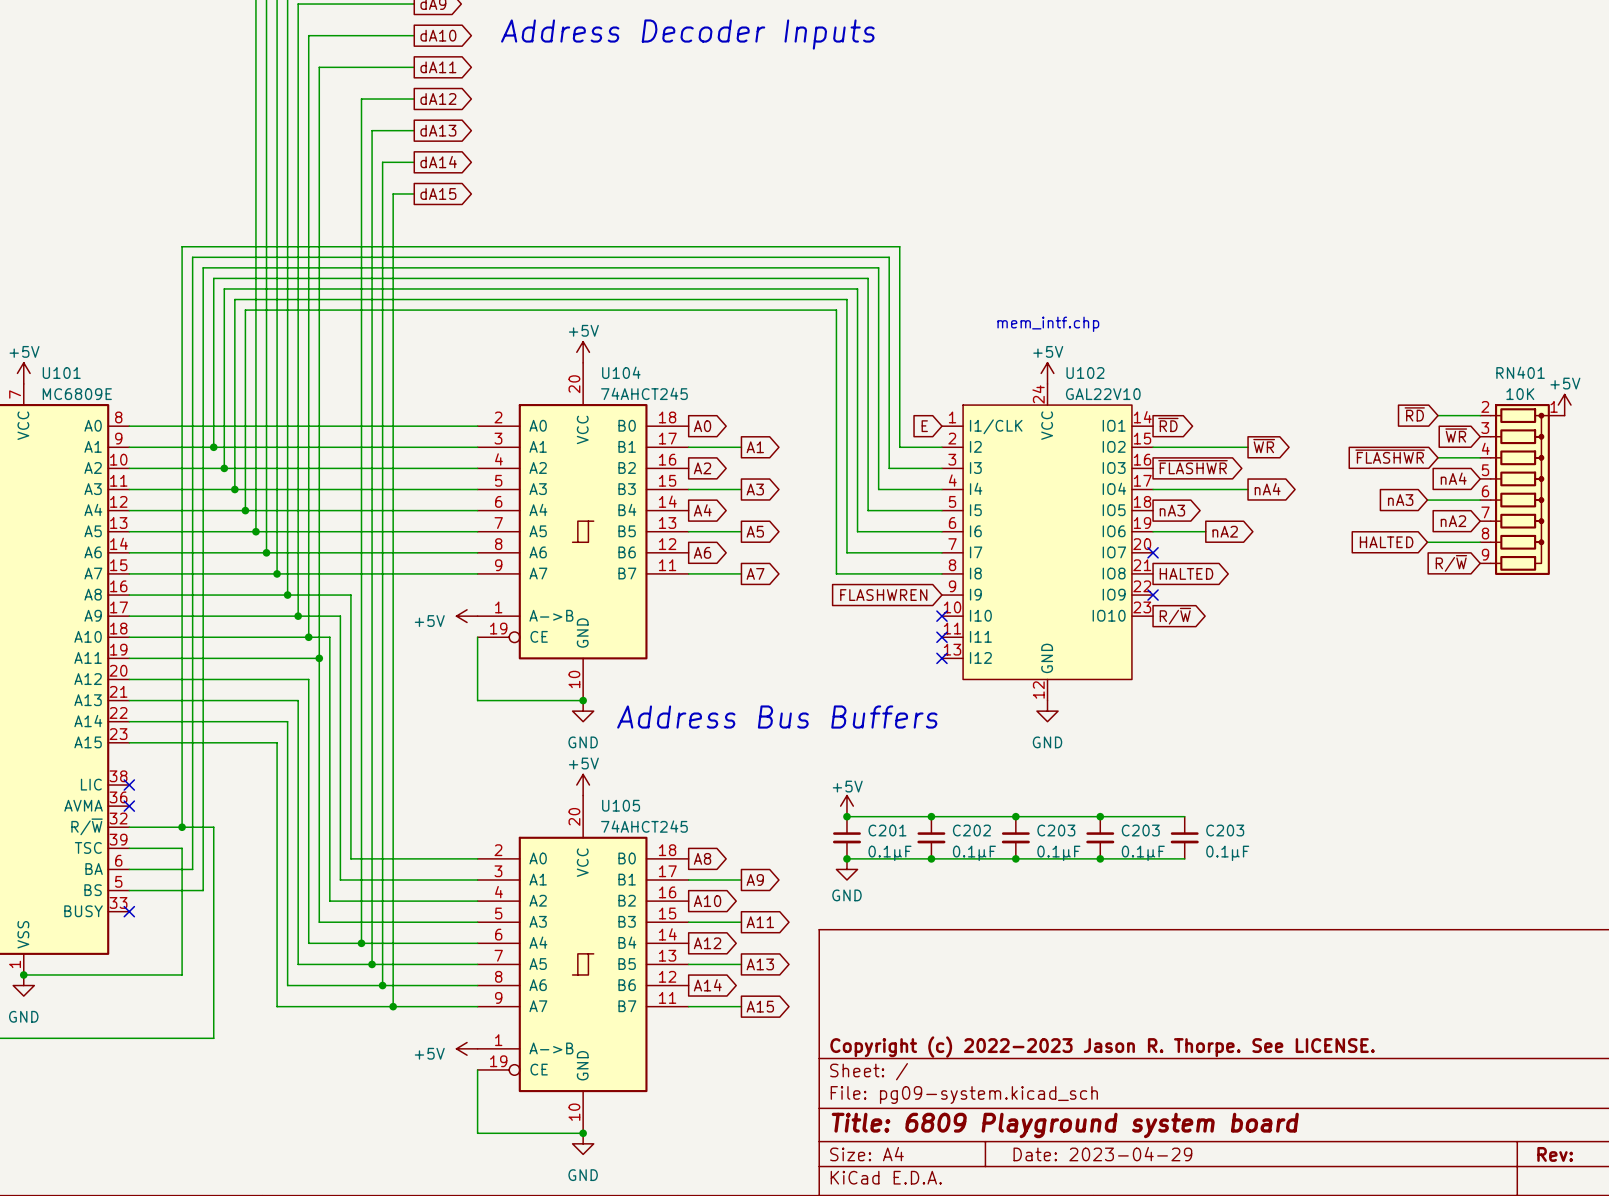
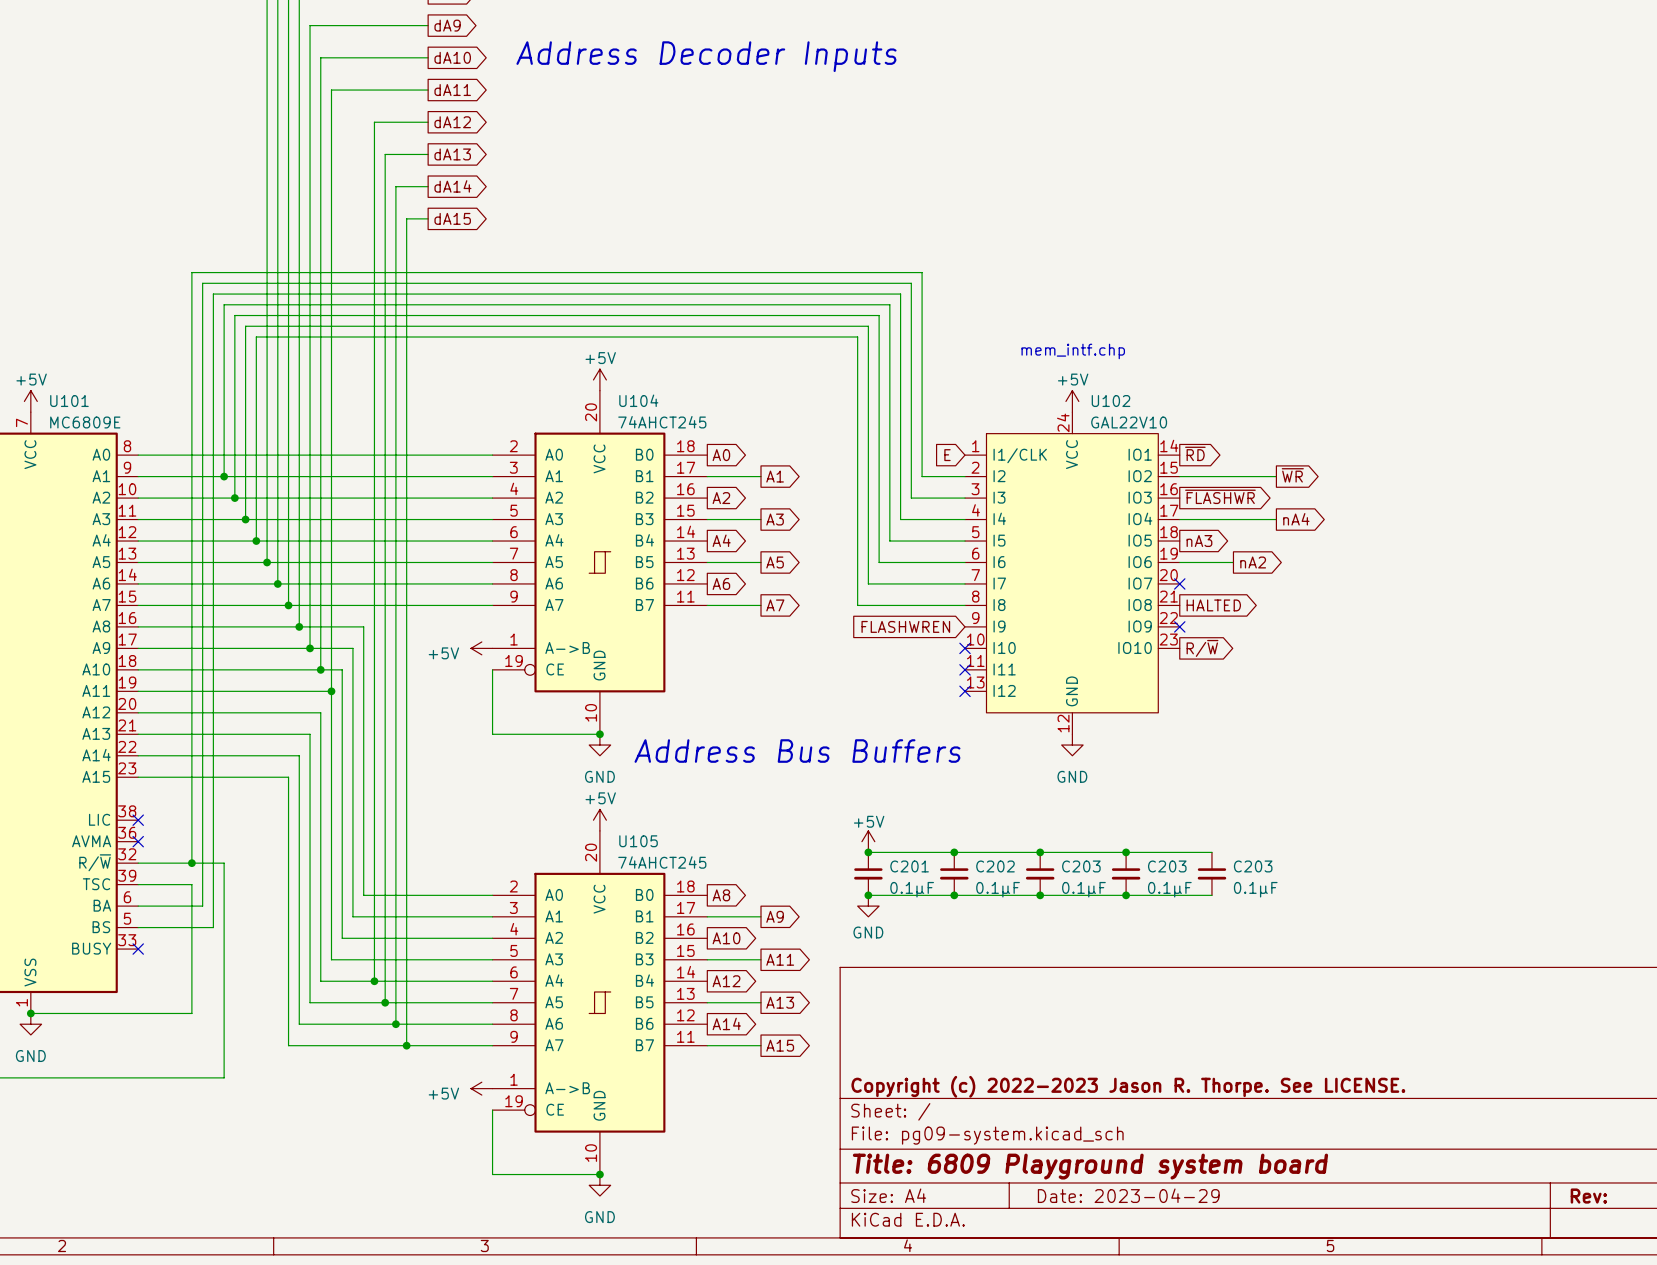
power symbol: +5V (1564, 405) -> none
global label: ~{RD} (1414, 414) -> none
wire: (1438, 415) (1480, 415) -> none
global label: ~{WR} (1456, 435) -> none
global label: ~{FLASHWR} (1390, 456) -> none
wire: (1438, 457) (1480, 457) -> none
global label: nA4 (1453, 478) -> none
RN401: 10K (1522, 489) -> none
global label: nA3 (1400, 500) -> none
wire: (1427, 500) (1480, 500) -> none
global label: nA2 (1453, 521) -> none
global label: HALTED (1386, 542) -> none
wire: (1427, 542) (1480, 542) -> none
global label: R/~{W} (1451, 563) -> none

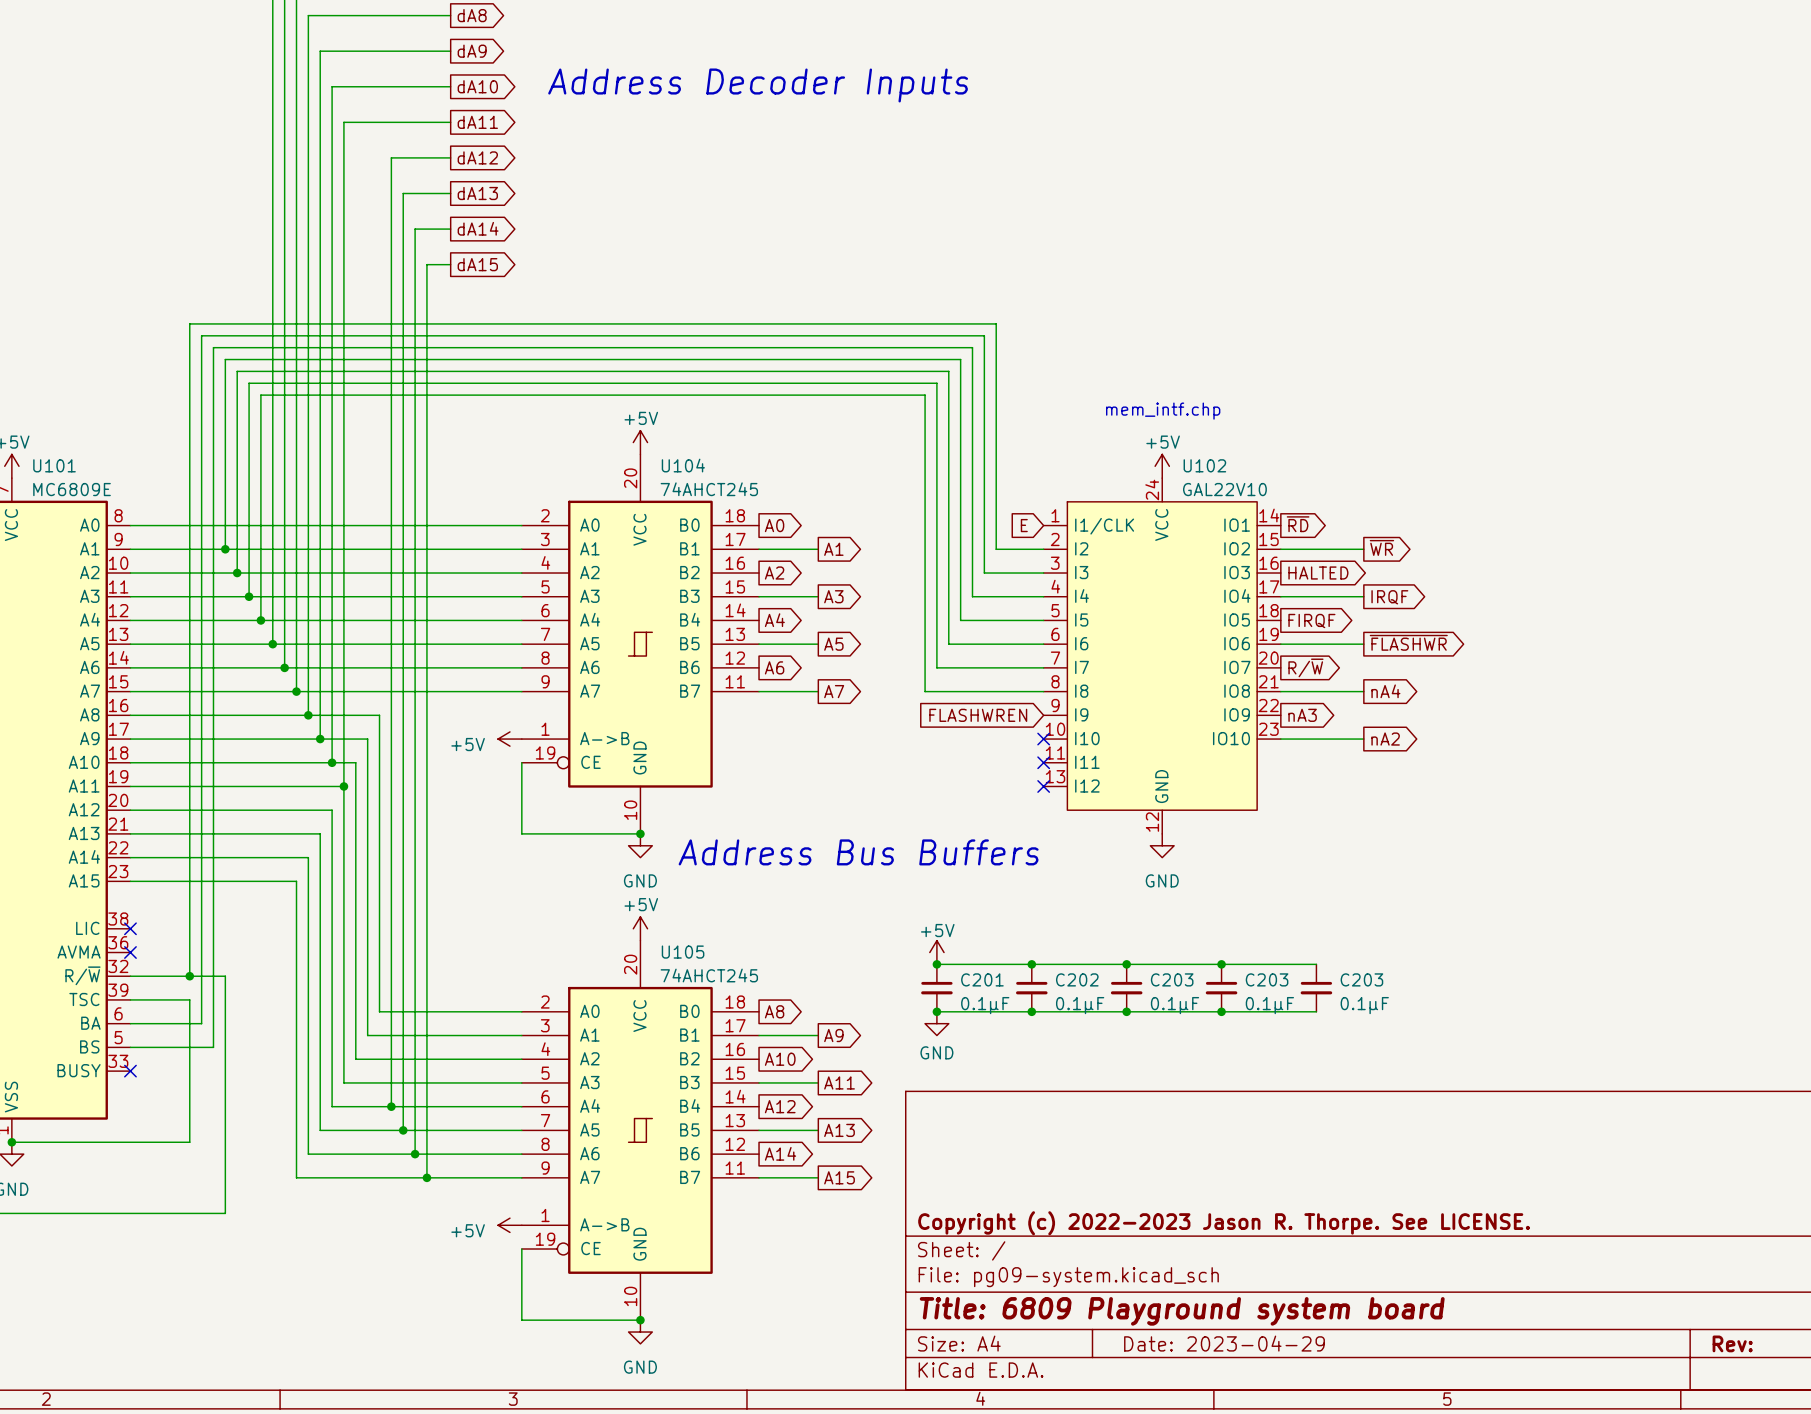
global label position: ~{WR} (1292, 475) -> ~{WR} (1381, 547)
wire: (1254, 476) (1276, 476) -> none
global label: ~{FLASHWR} (1220, 496) -> HALTED (1318, 573)
wire: (1254, 519) (1276, 519) -> (1340, 644) (1363, 644)
global label position: nA4 (1296, 519) -> nA4 (1385, 691)
global label: none -> IRQF (1389, 597)
global label: nA3 (1199, 541) -> FIRQF (1311, 621)
global label: none -> ~{FLASHWR} (1408, 642)
global label position: nA2 (1253, 562) -> nA2 (1385, 739)
no-connect mark: (1179, 583) -> none
wire: none -> (1280, 691) (1363, 691)
global label: HALTED (1213, 605) -> none
no-connect mark: (1179, 626) -> none
global label: none -> nA3 (1302, 715)
wire: none -> (1280, 739) (1363, 739)
global label position: R/~{W} (1202, 648) -> R/~{W} (1305, 667)

